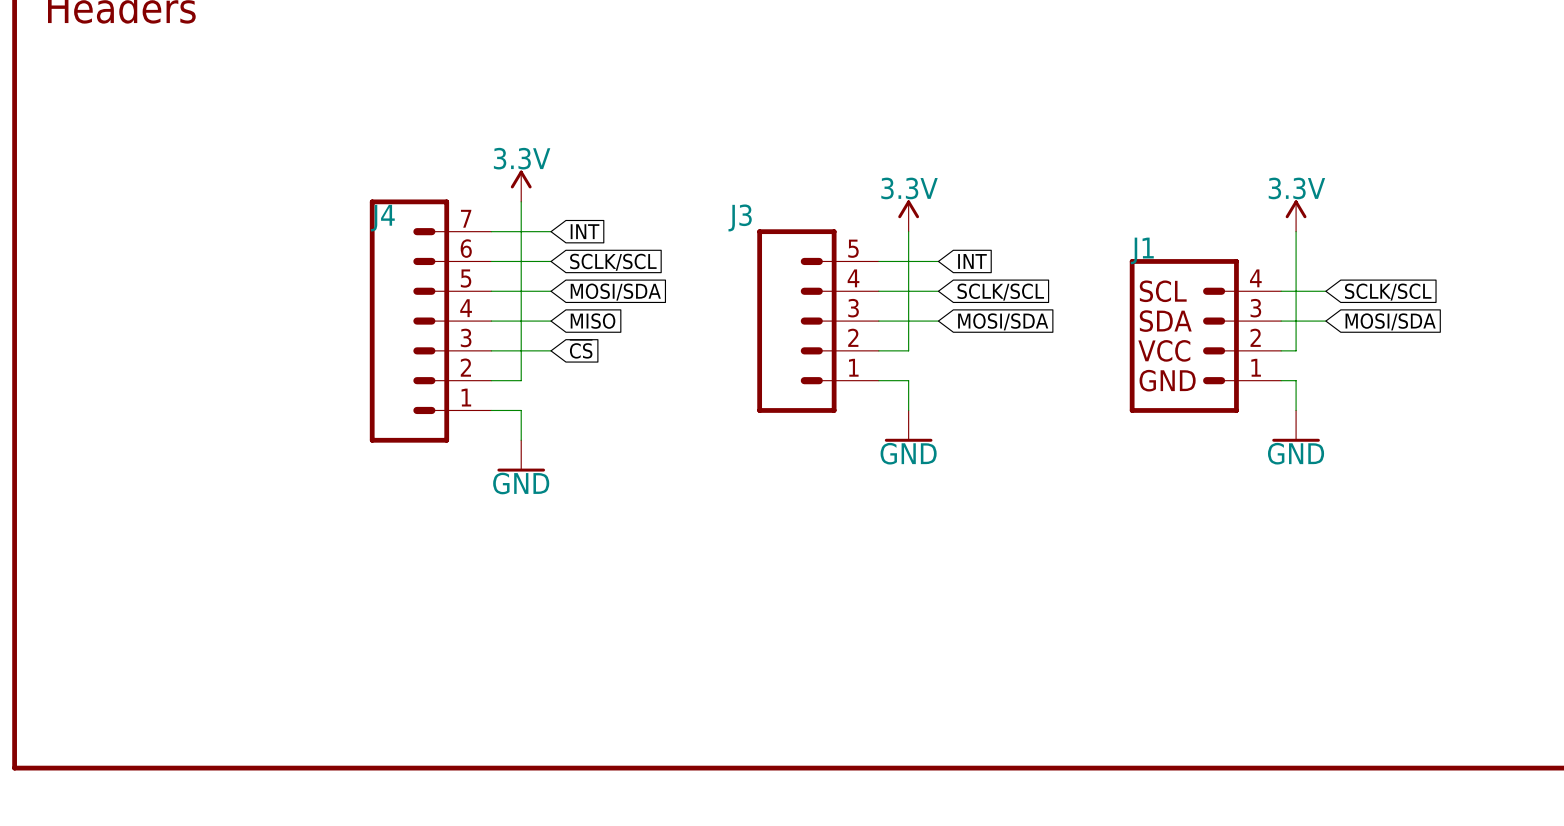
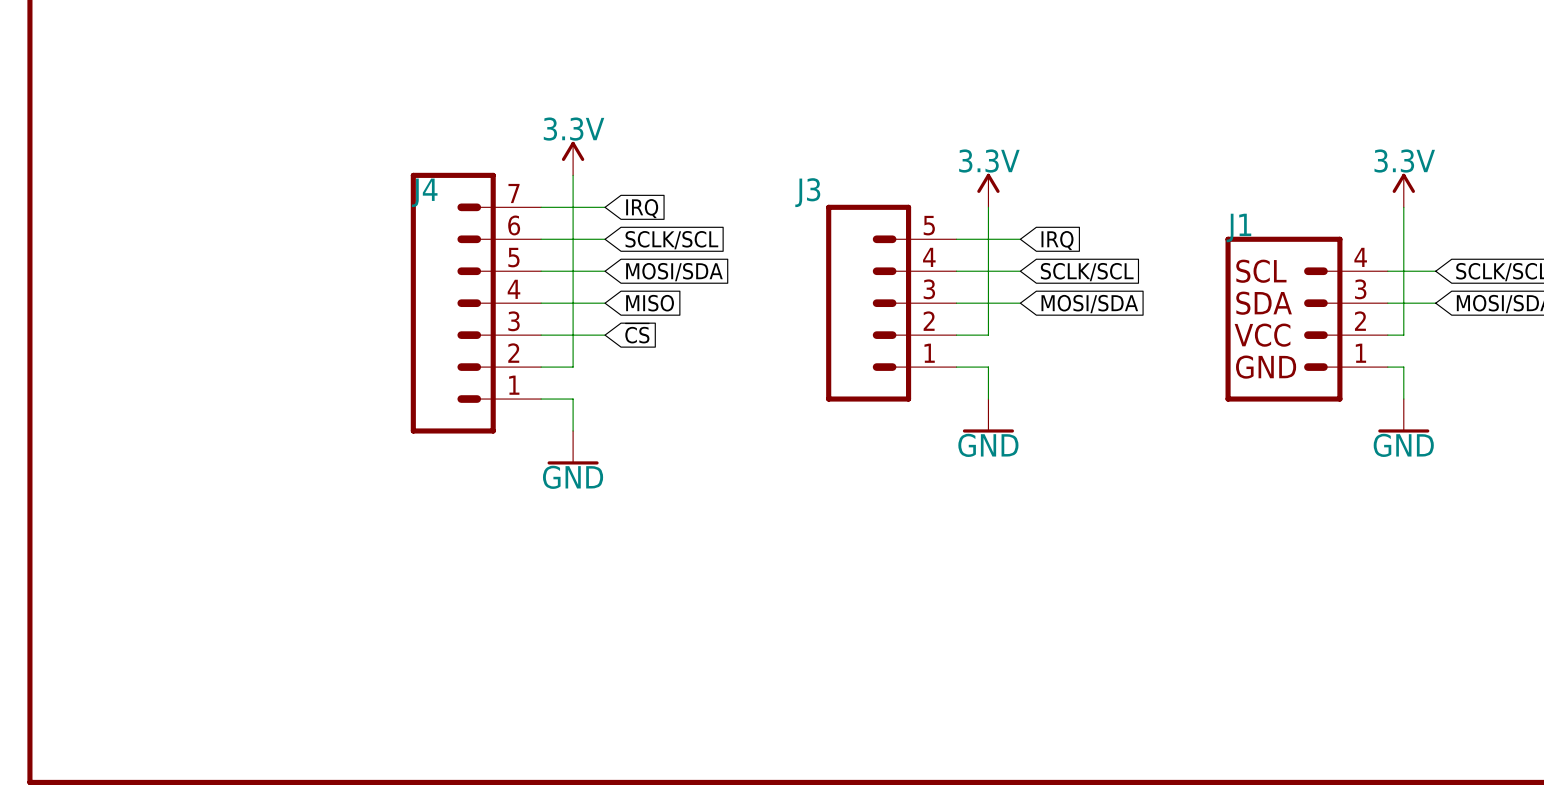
global label: INT (585, 231) -> IRQ (642, 208)
global label: INT (972, 261) -> IRQ (1057, 240)

